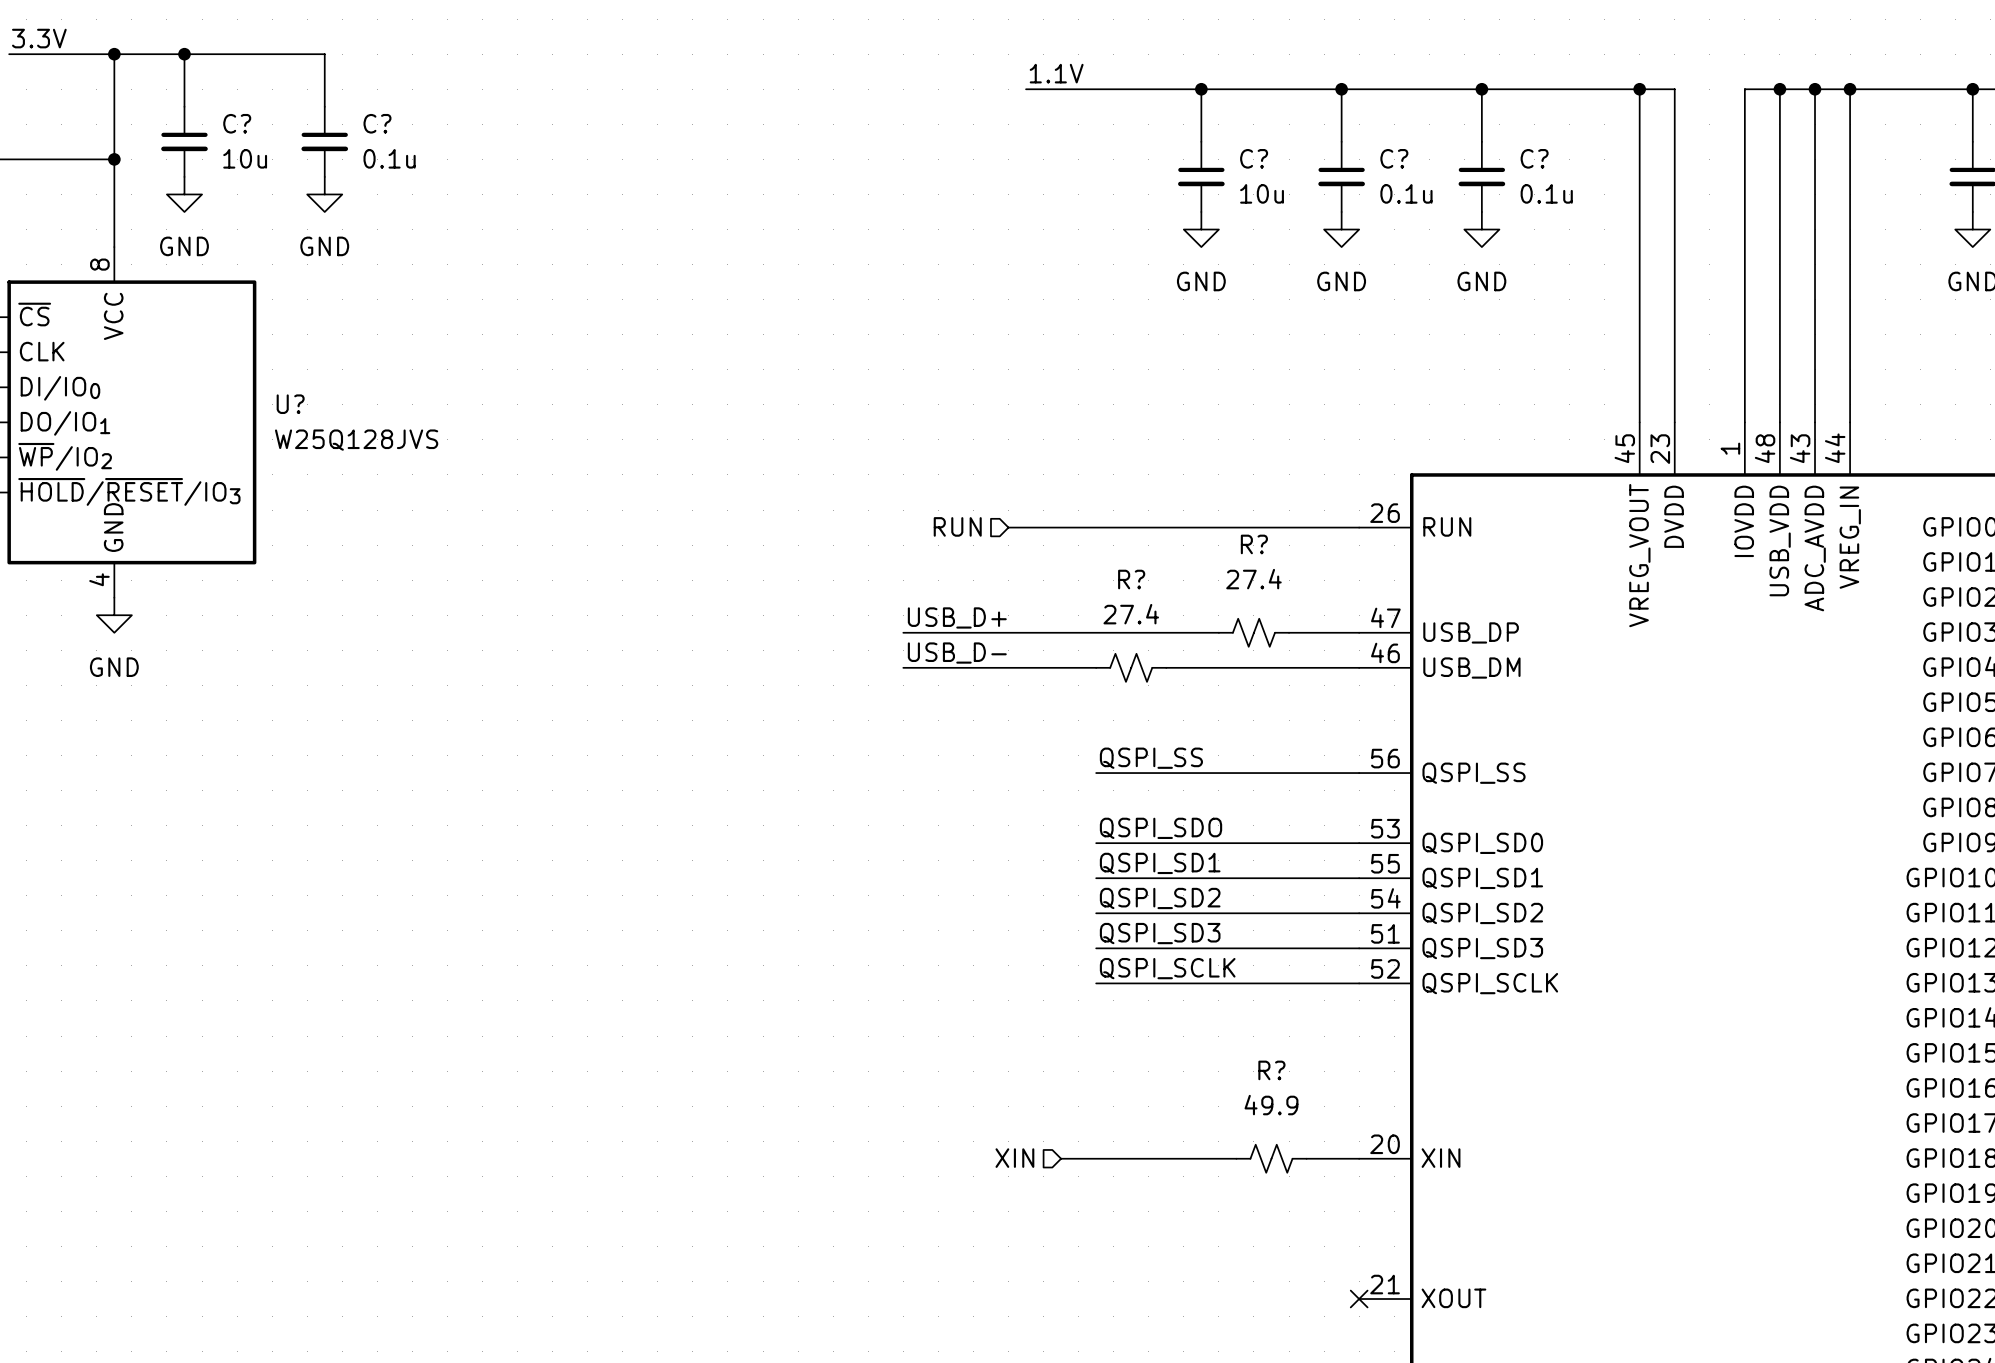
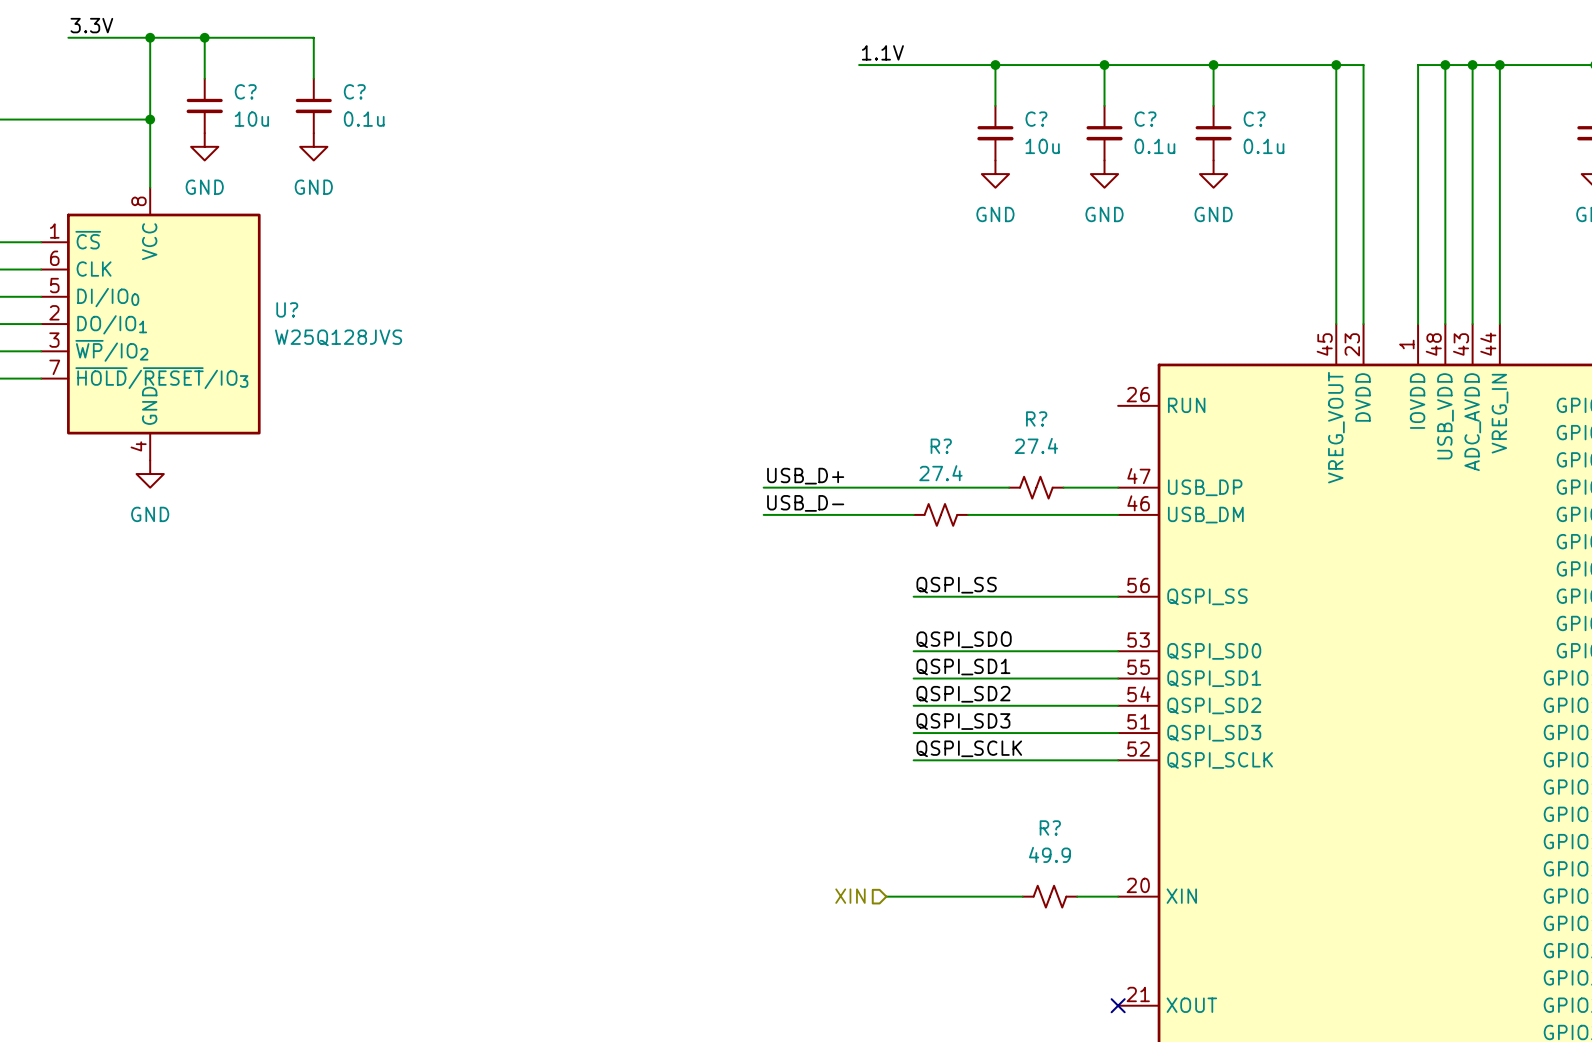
hierarchical label: RUN (957, 526) -> none
wire: (1008, 527) (1359, 527) -> none

